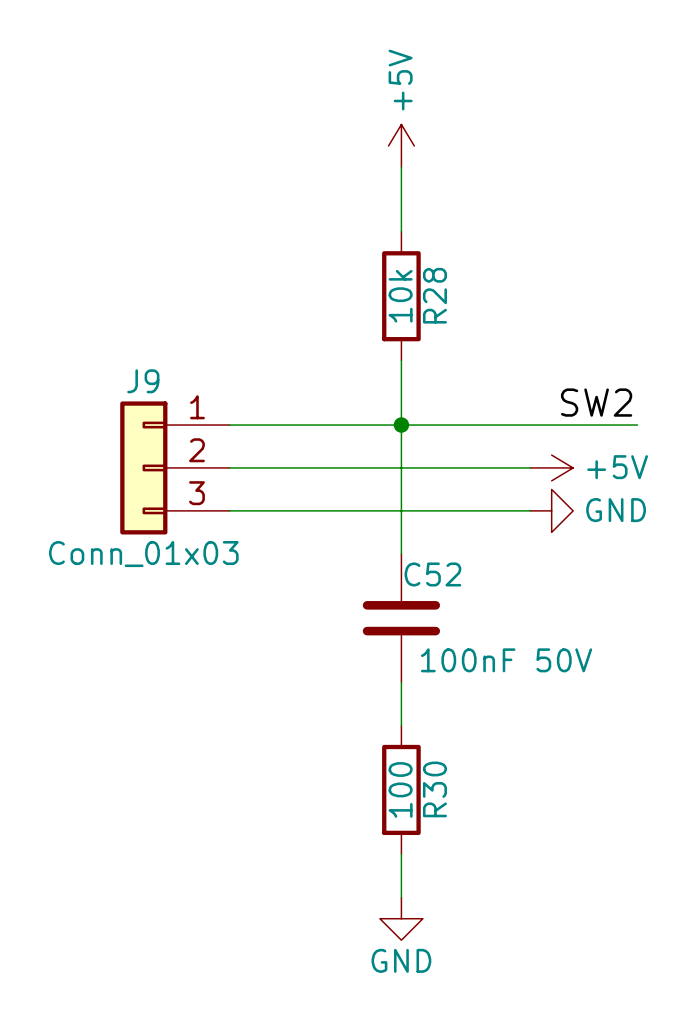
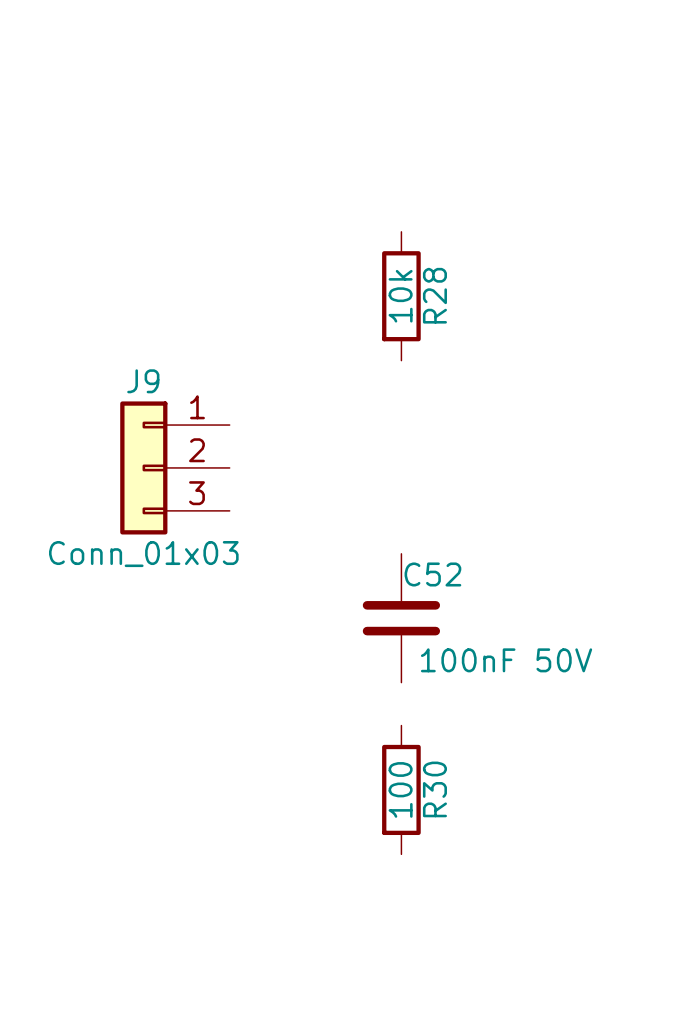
power symbol: +5V (401, 145) -> none
wire: (401, 167) (401, 231) -> none
wire: (401, 360) (401, 553) -> none
label: SW2 (596, 402) -> none
wire: (229, 425) (637, 425) -> none
junction: (401, 425) -> none
wire: (229, 467) (530, 467) -> none
power symbol: +5V (551, 467) -> none
wire: (229, 510) (530, 510) -> none
power symbol: GND (551, 510) -> none
wire: (401, 682) (401, 725) -> none
wire: (401, 854) (401, 897) -> none
power symbol: GND (401, 918) -> none

